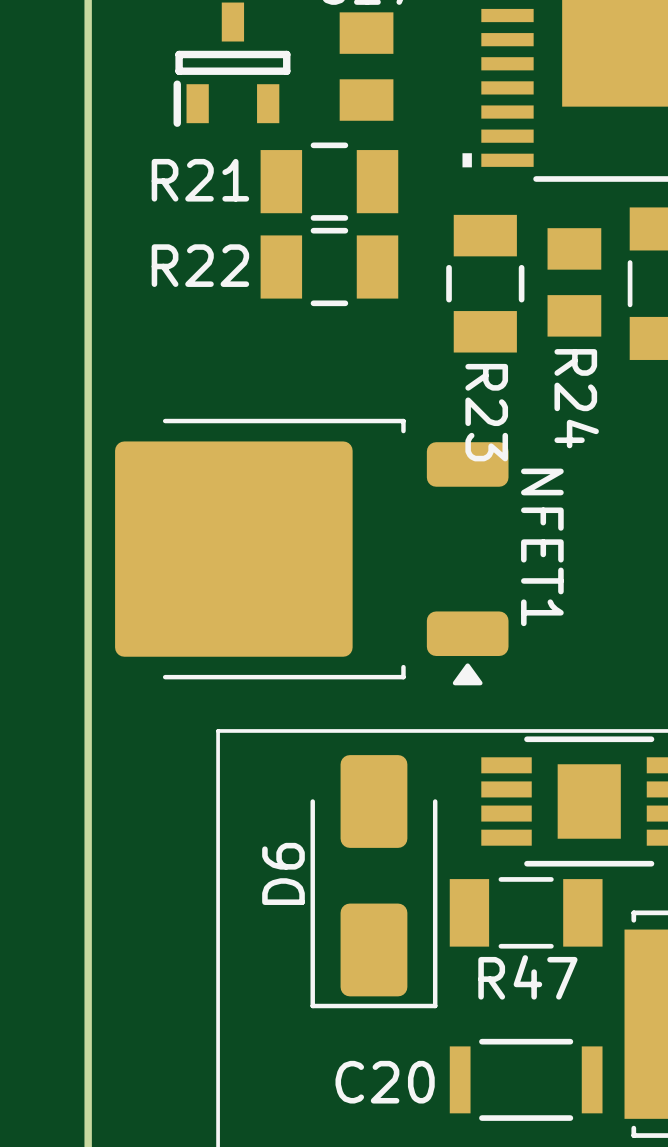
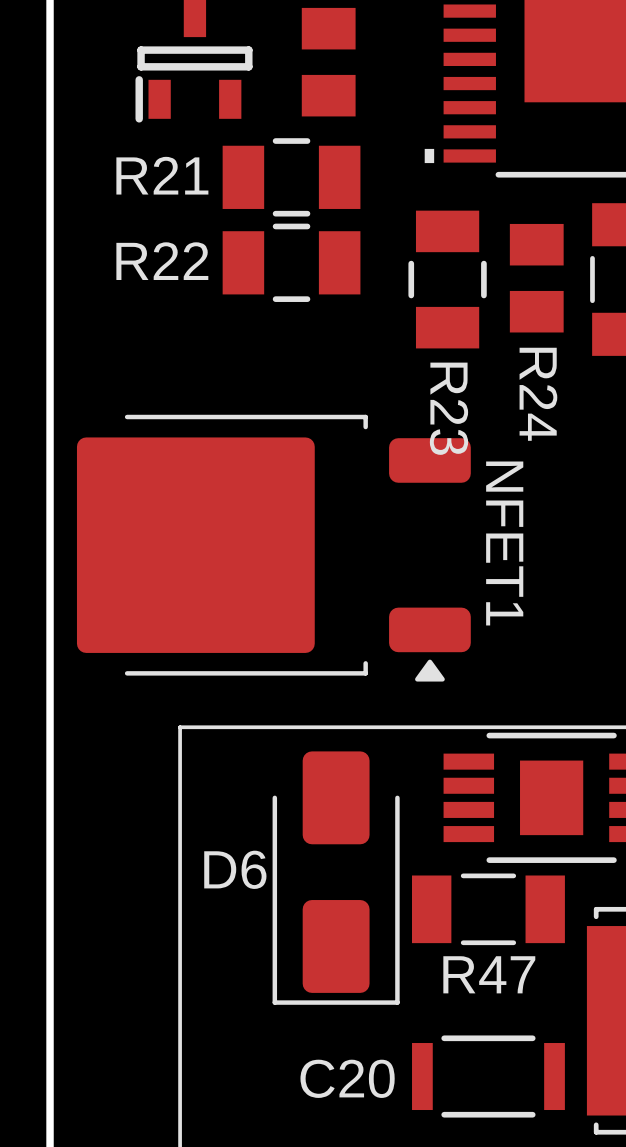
D6 name rotation: 0° (283, 873) -> 90° clockwise (235, 869)

